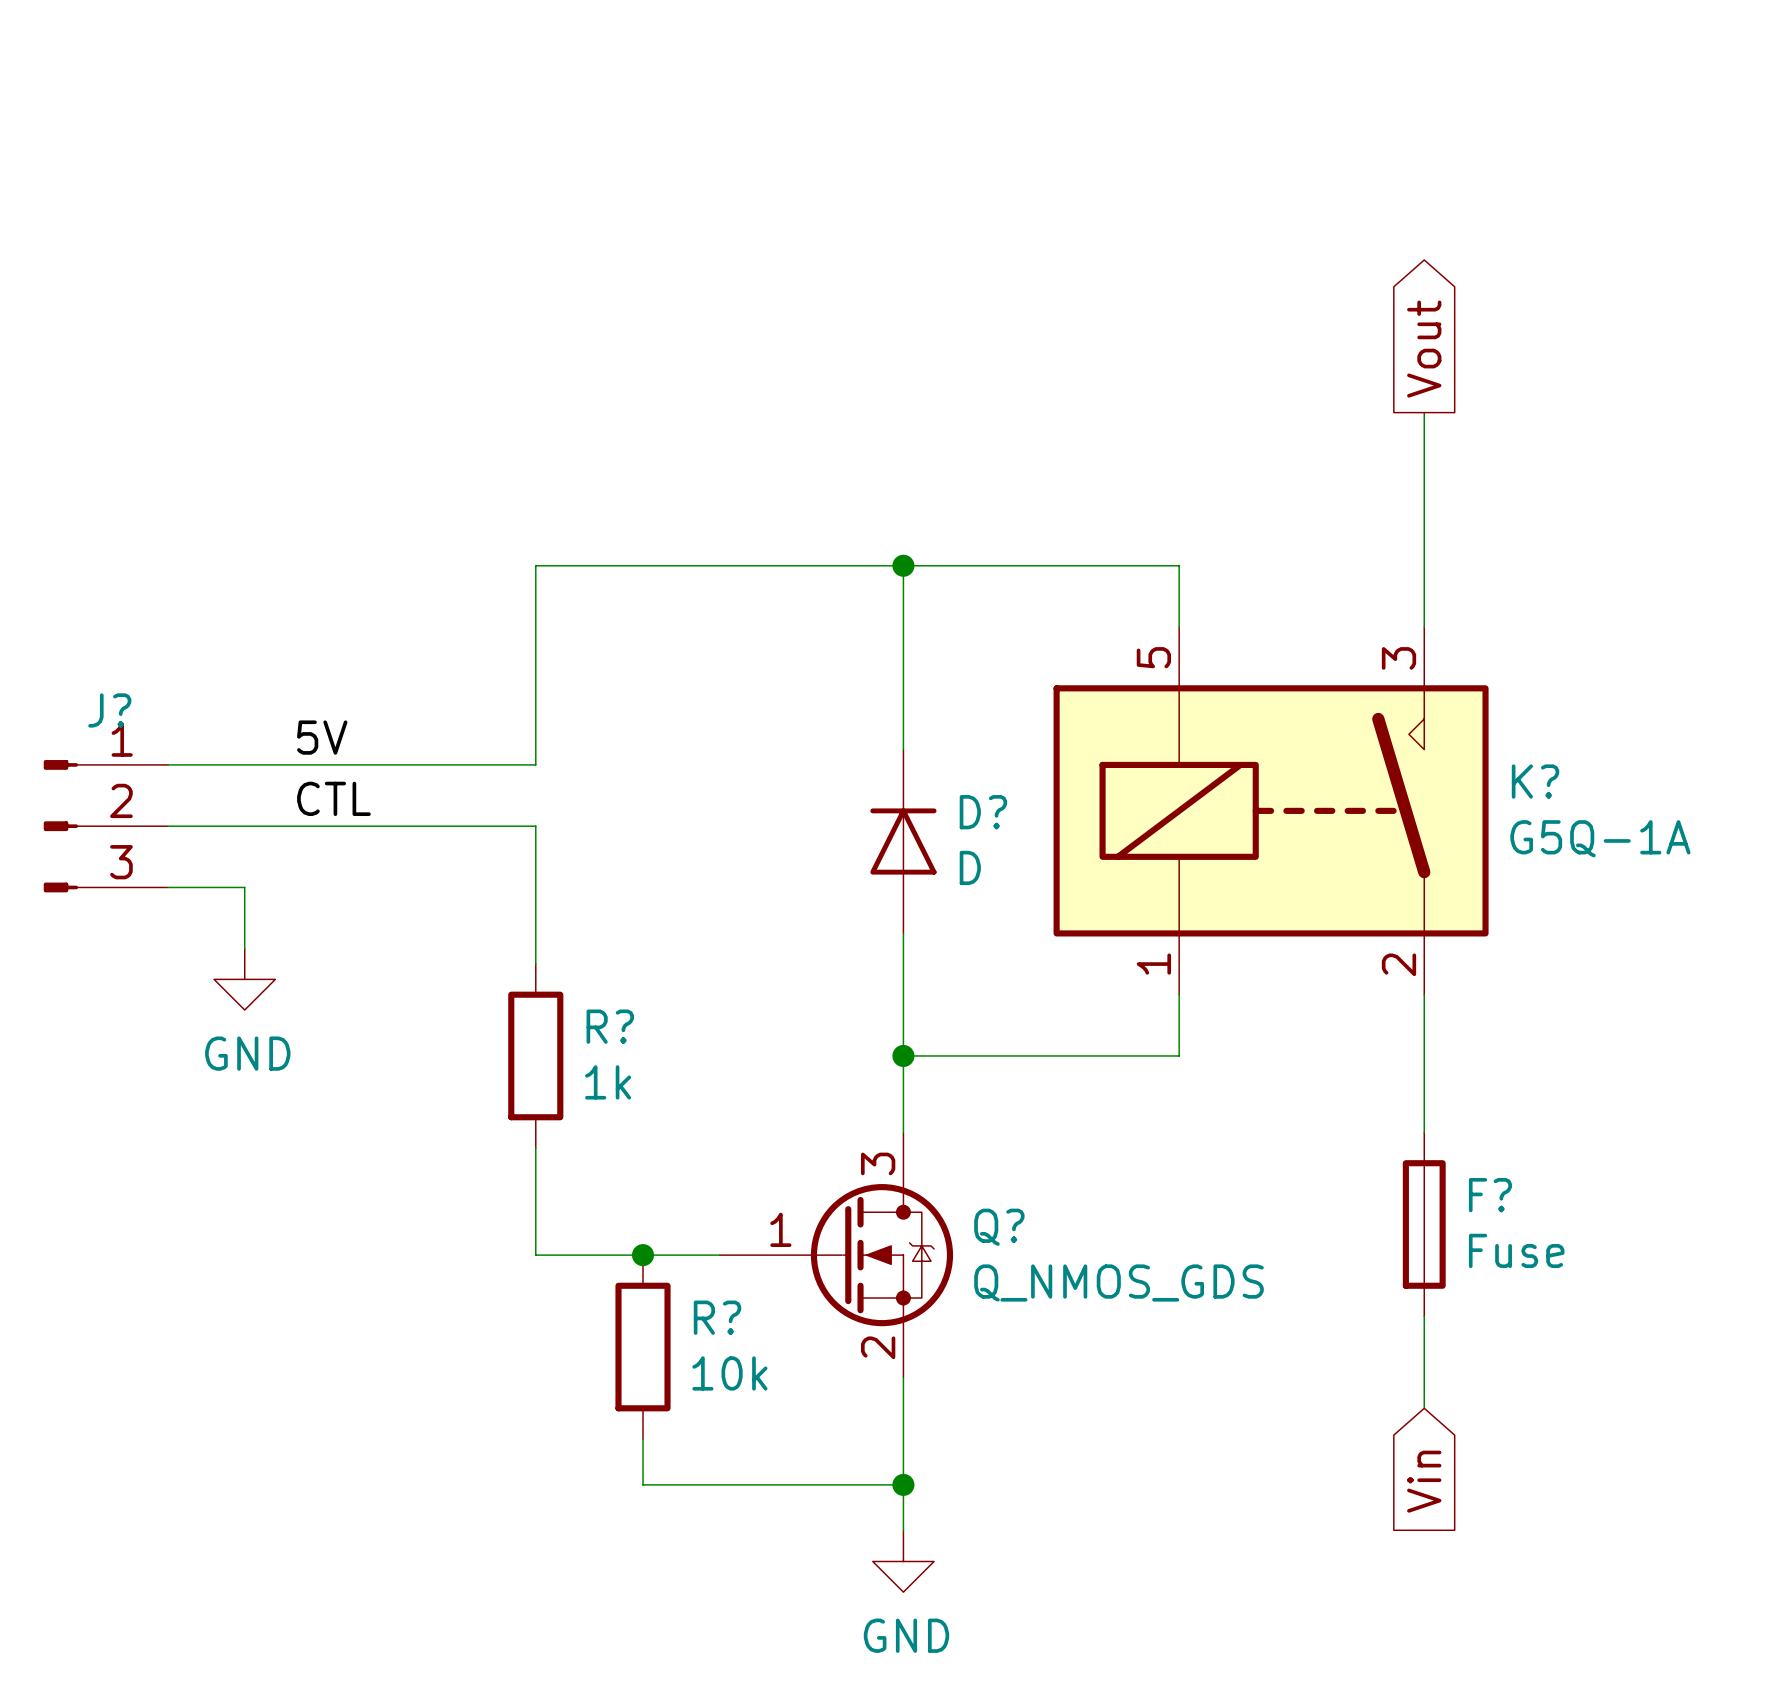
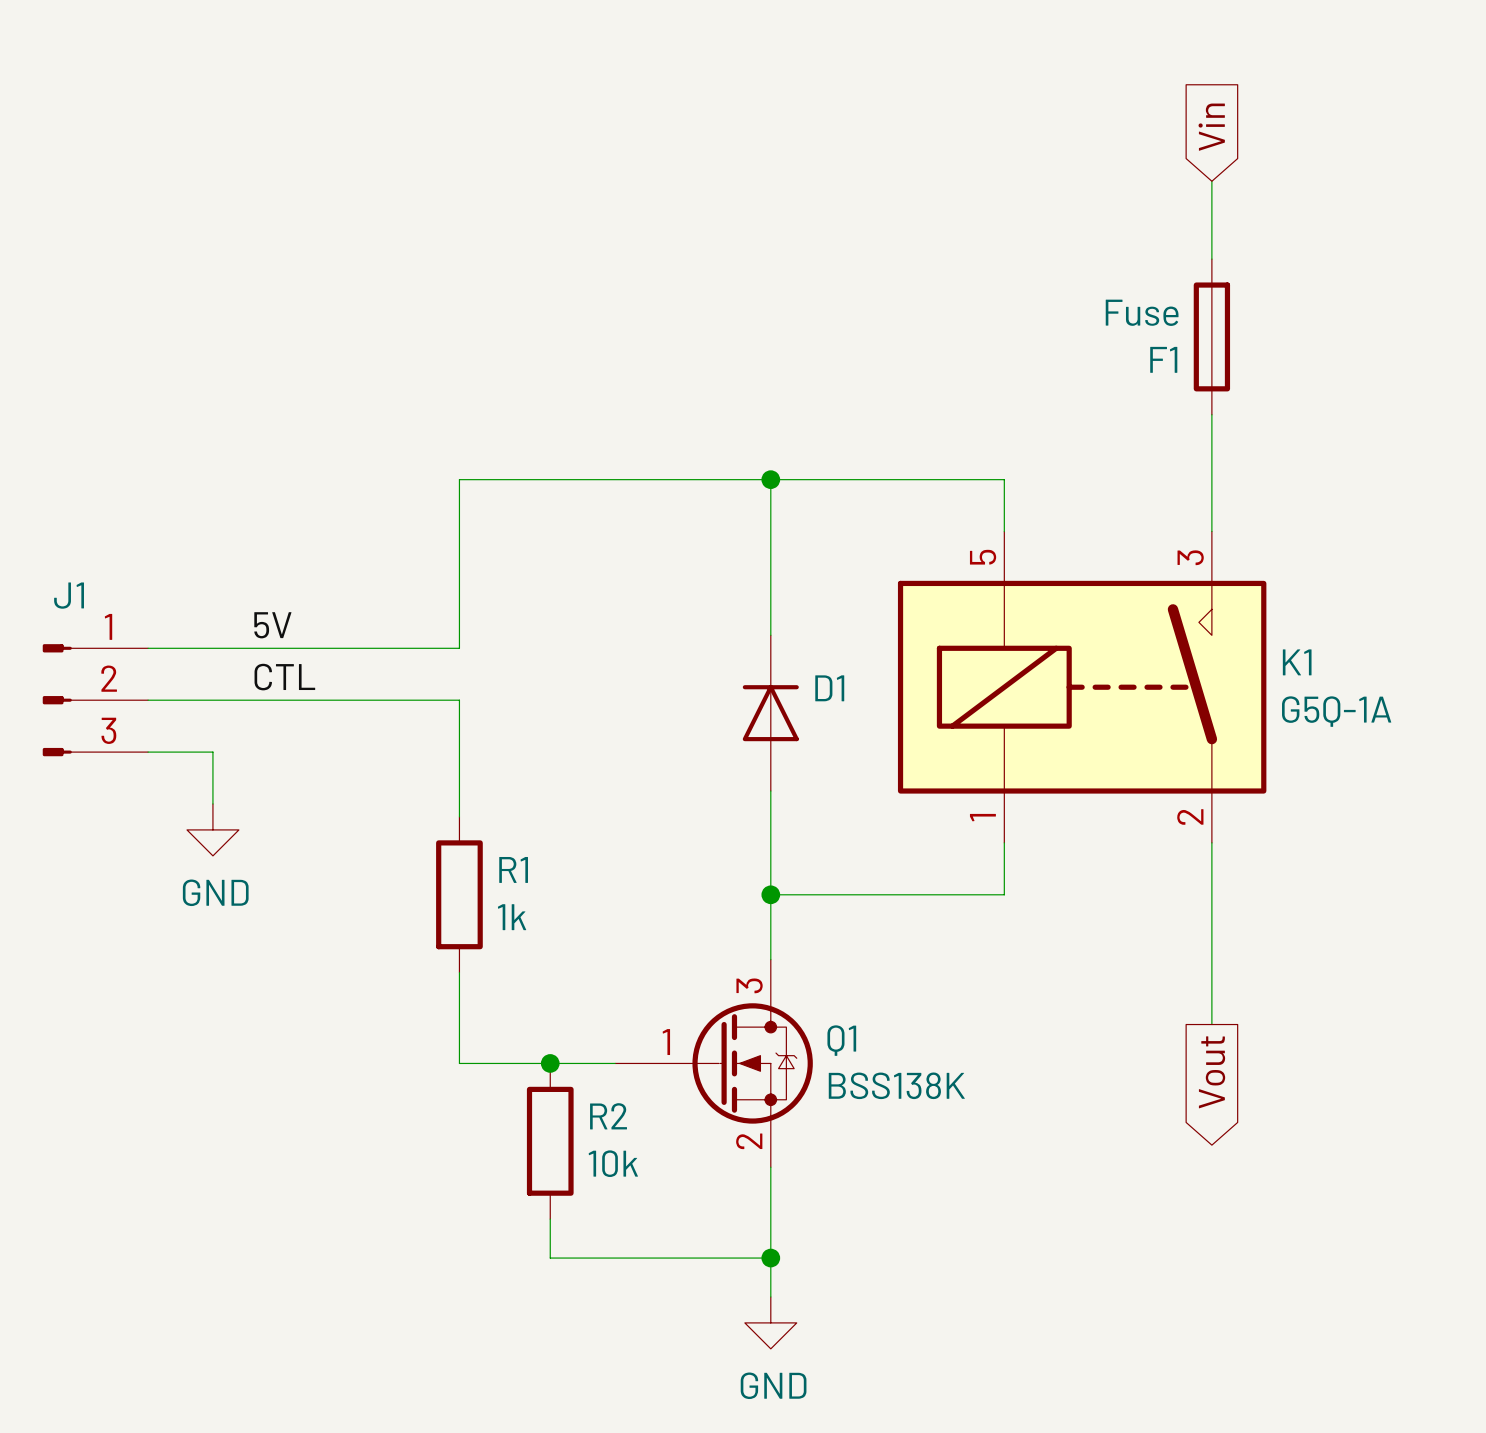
global label: none -> Vin (1211, 127)
wire: none -> (1211, 181) (1211, 259)
global label: Vout (1424, 349) -> none
F1: none -> Fuse (1211, 336)
J? name: J? (109, 710) -> J1 (69, 595)
K? name: K? (1535, 781) -> K1 (1297, 662)
D? name: D? (983, 812) -> D1 (829, 688)
D? value: D (970, 867) -> none
R? name: R? (610, 1026) -> R1 (513, 869)
F?: Fuse (1424, 1224) -> none
Q? name: Q? (999, 1227) -> Q1 (841, 1040)
global label: none -> Vout (1212, 1072)
Q? value: Q_NMOS_GDS (1118, 1283) -> BSS138K (896, 1085)
wire: (1424, 1316) (1424, 1408) -> none
R? name: R? (717, 1317) -> R2 (608, 1116)
global label: Vin (1424, 1481) -> none

